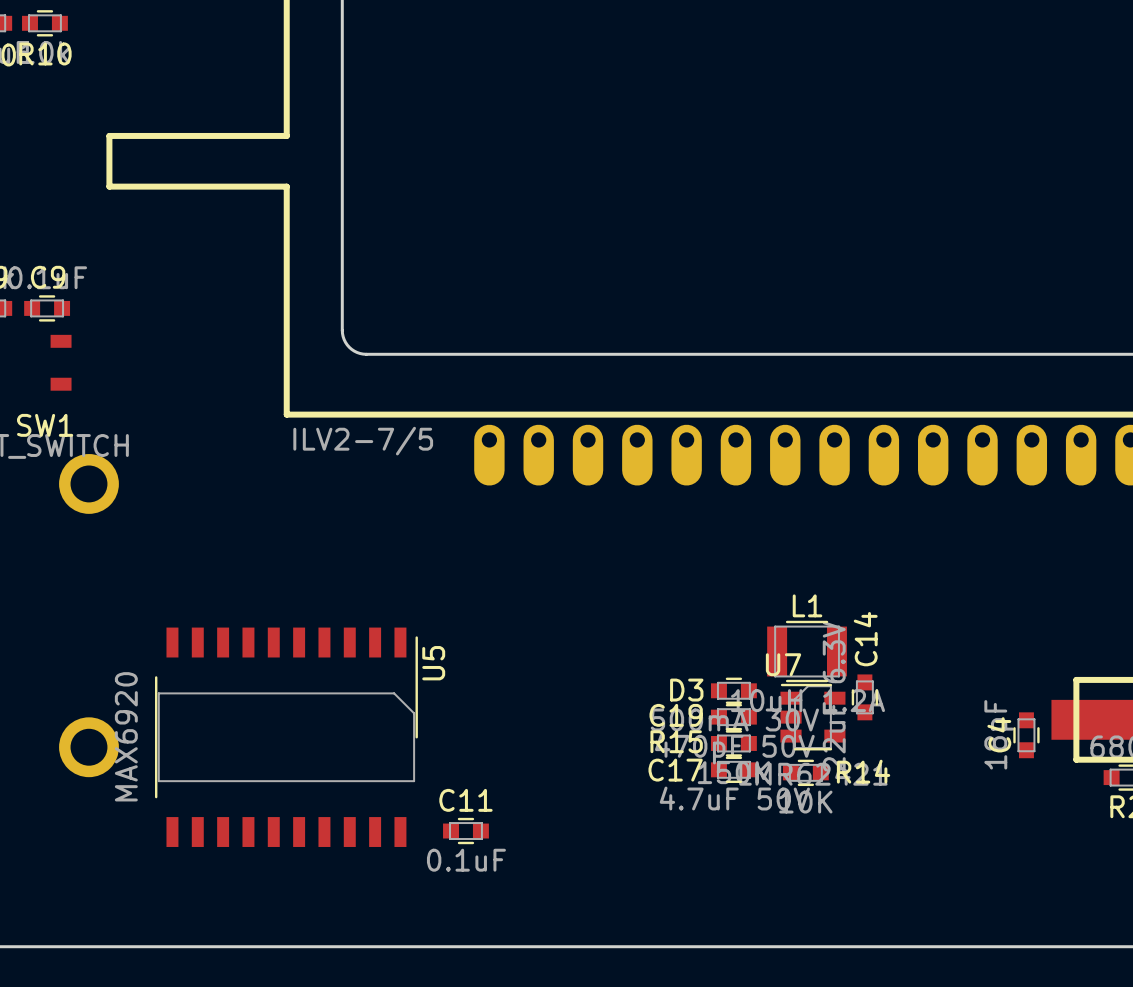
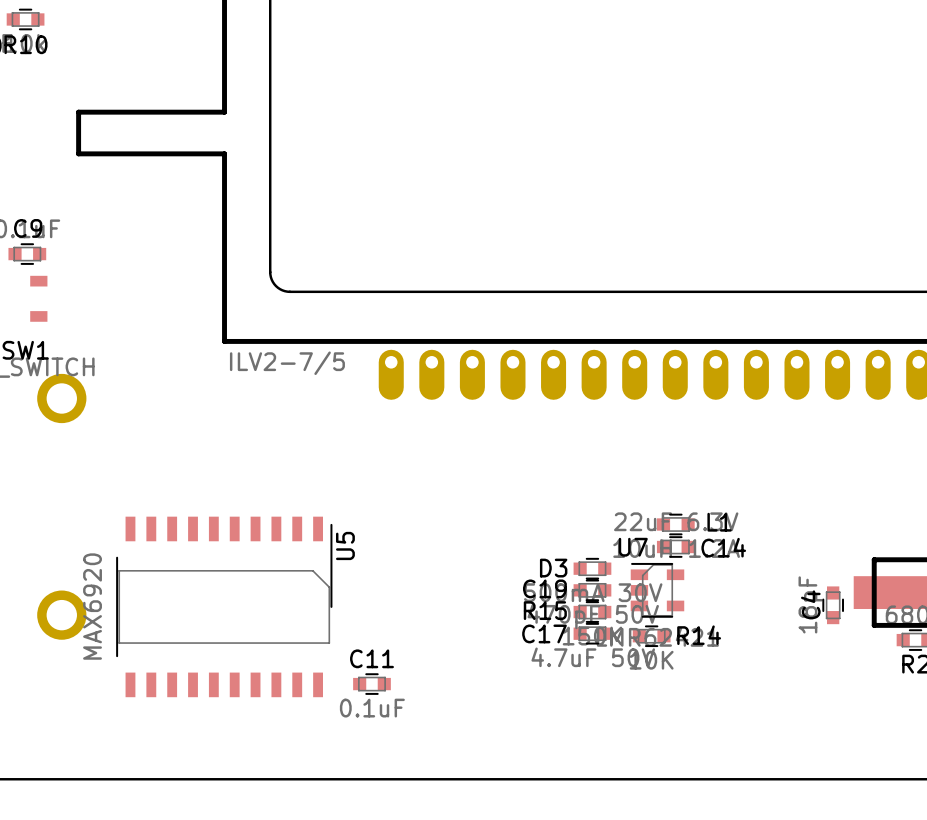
L1 name position: L1 (807, 605) -> L1 (719, 522)
L1 footprint: [767, 620, 847, 683] -> [656, 513, 695, 536]
C14 rotation: 0° (864, 697) -> 90° clockwise (675, 547)
C14 position: (864, 697) -> (675, 547)

